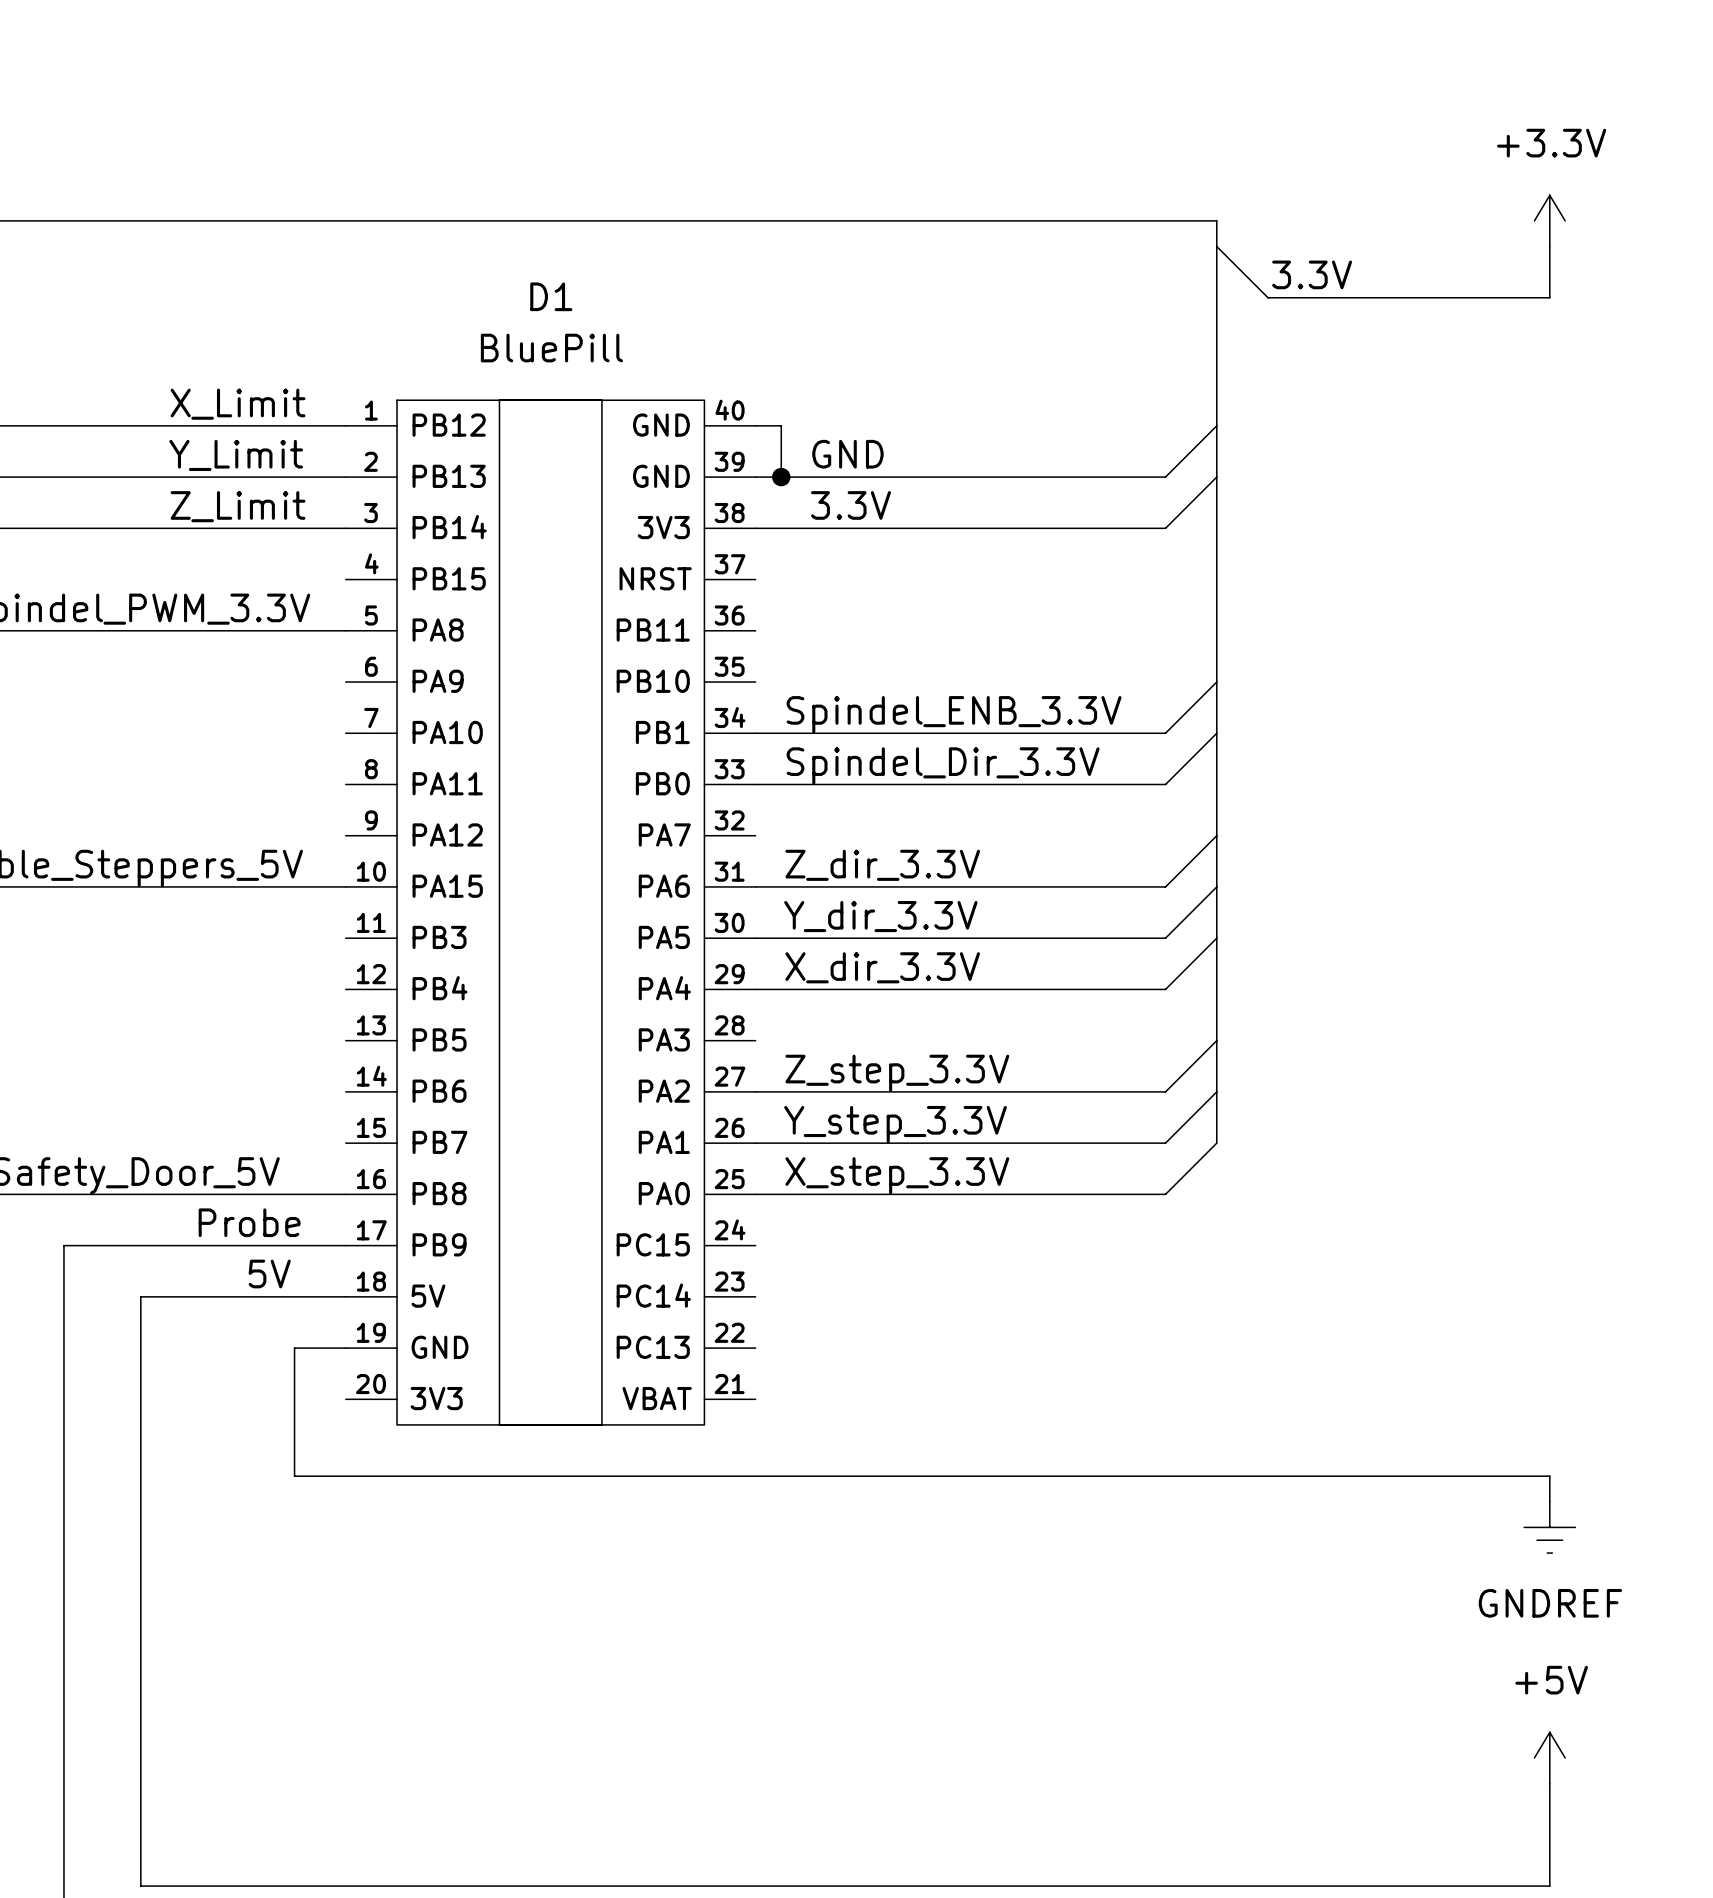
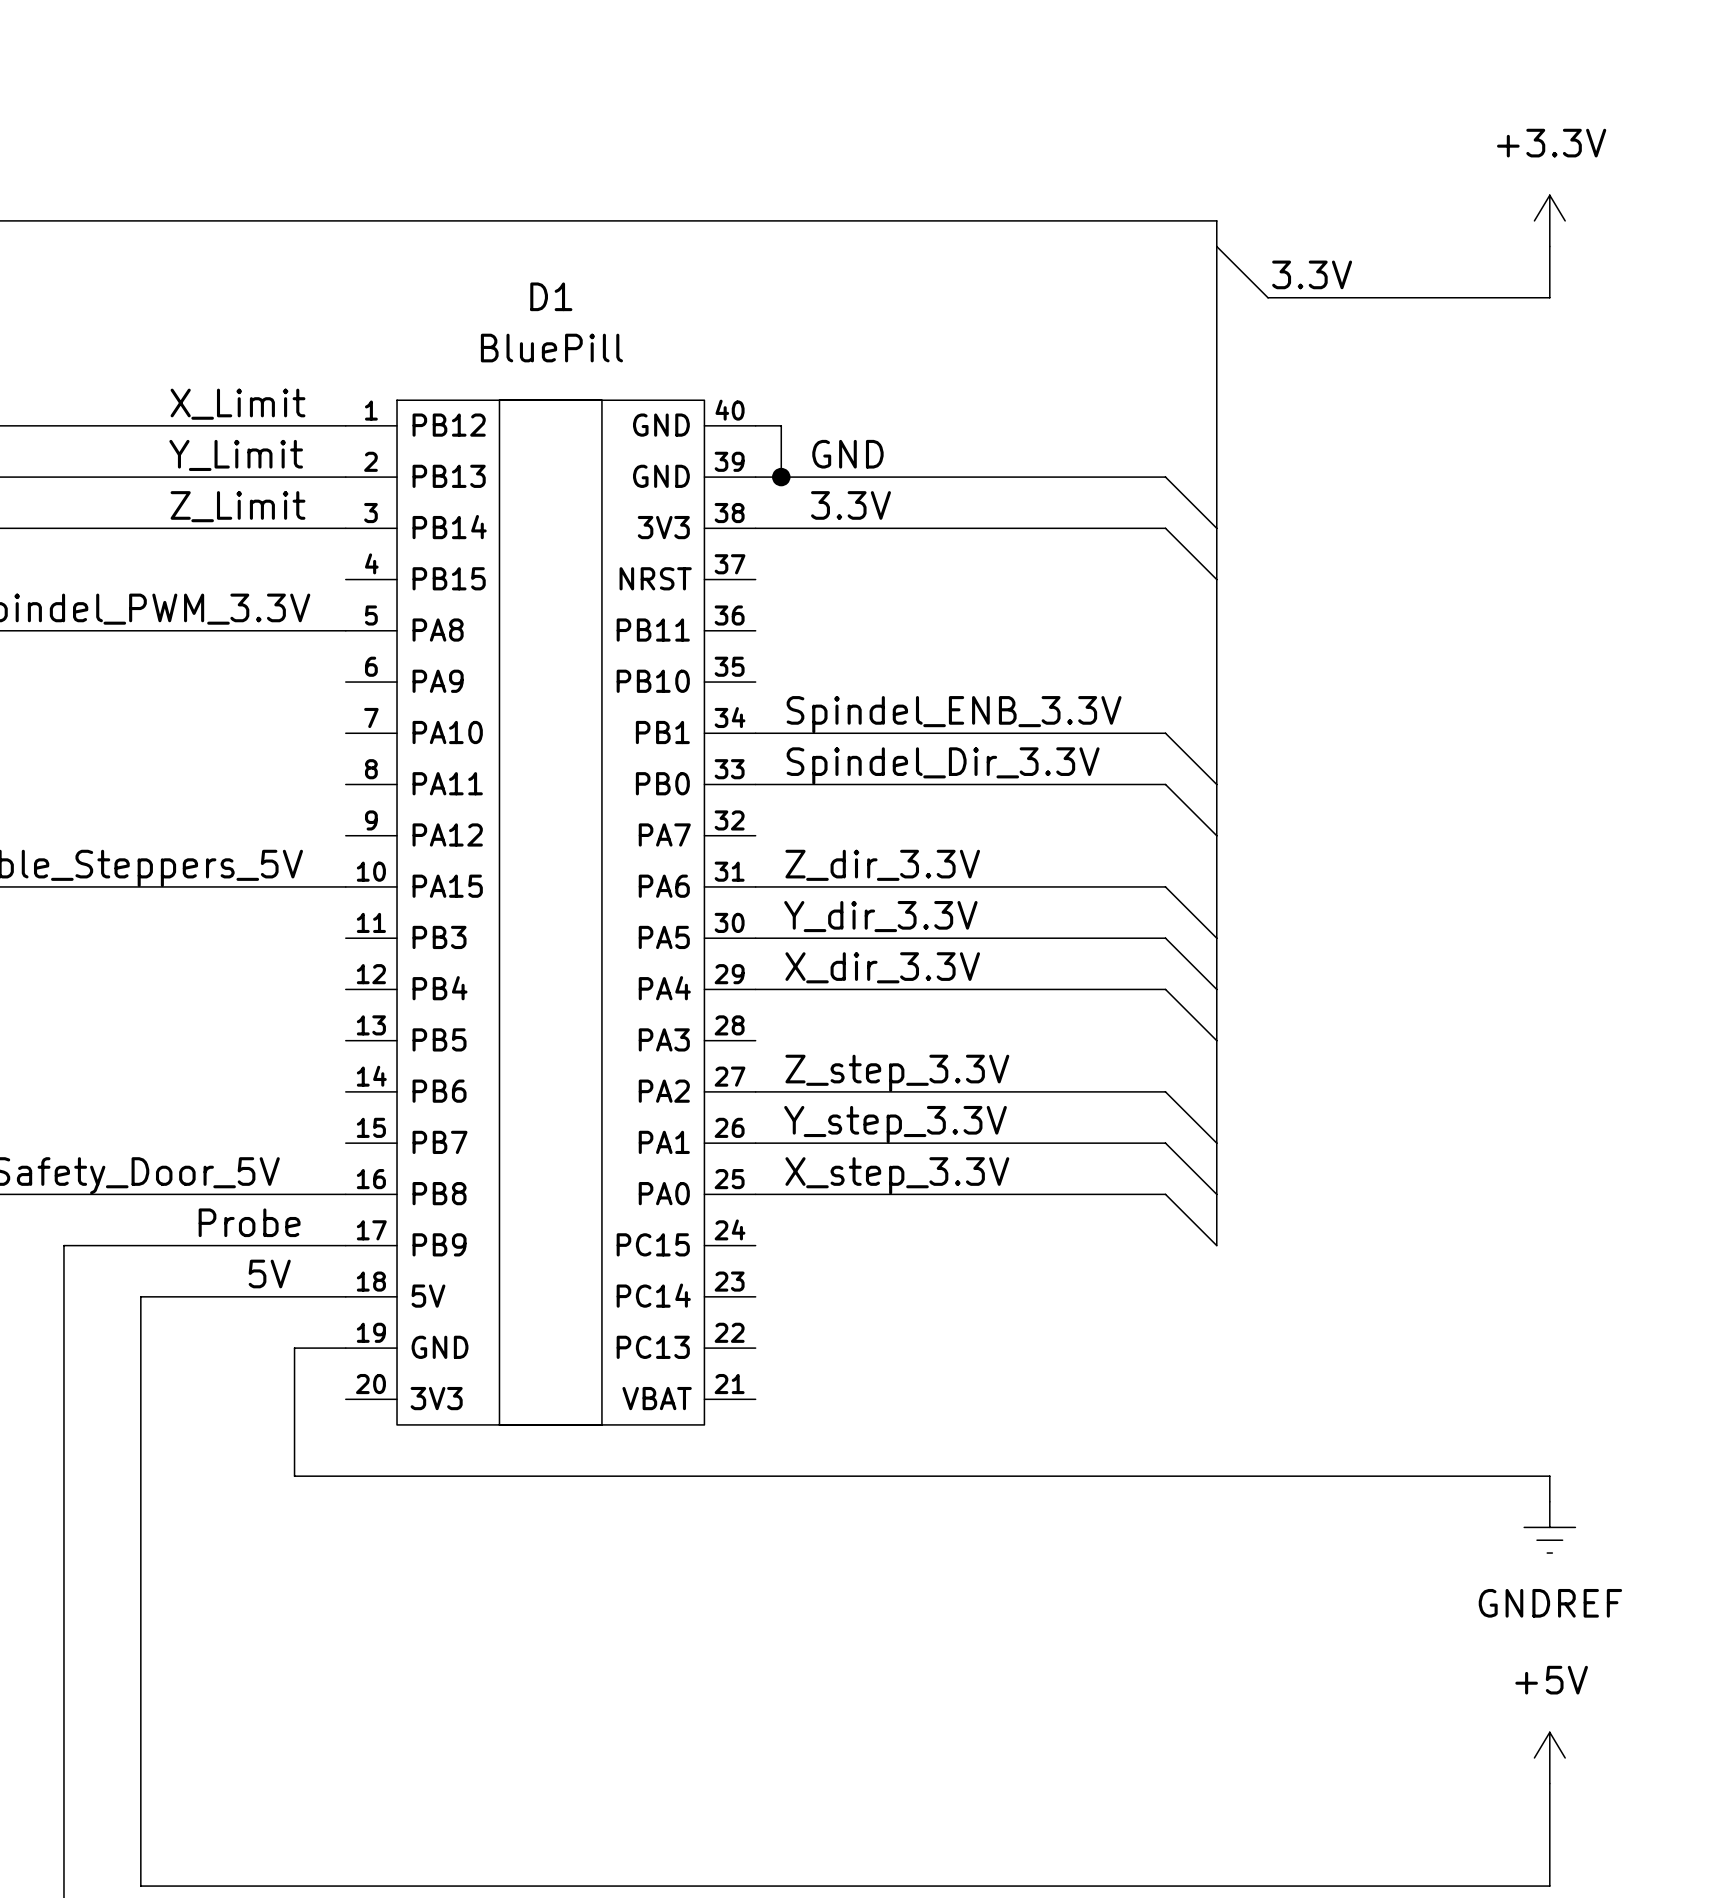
wire: (1216, 425) (1165, 477) -> (1216, 528) (1165, 477)
wire: (1216, 477) (1165, 528) -> (1216, 579) (1165, 528)
wire: (1216, 682) (1165, 733) -> (1216, 784) (1165, 733)
wire: (1216, 733) (1165, 784) -> (1216, 835) (1165, 784)
wire: (1216, 835) (1165, 886) -> (1216, 938) (1165, 886)
wire: (1216, 886) (1165, 938) -> (1216, 989) (1165, 938)
wire: (1216, 938) (1165, 989) -> (1216, 1040) (1165, 989)
wire: (1216, 1040) (1165, 1091) -> (1216, 1143) (1165, 1091)
wire: (1216, 1091) (1165, 1143) -> (1216, 1194) (1165, 1143)
wire: (1216, 1143) (1165, 1194) -> (1216, 1245) (1165, 1194)
bus: none -> (1216, 1143) (1216, 1245)

